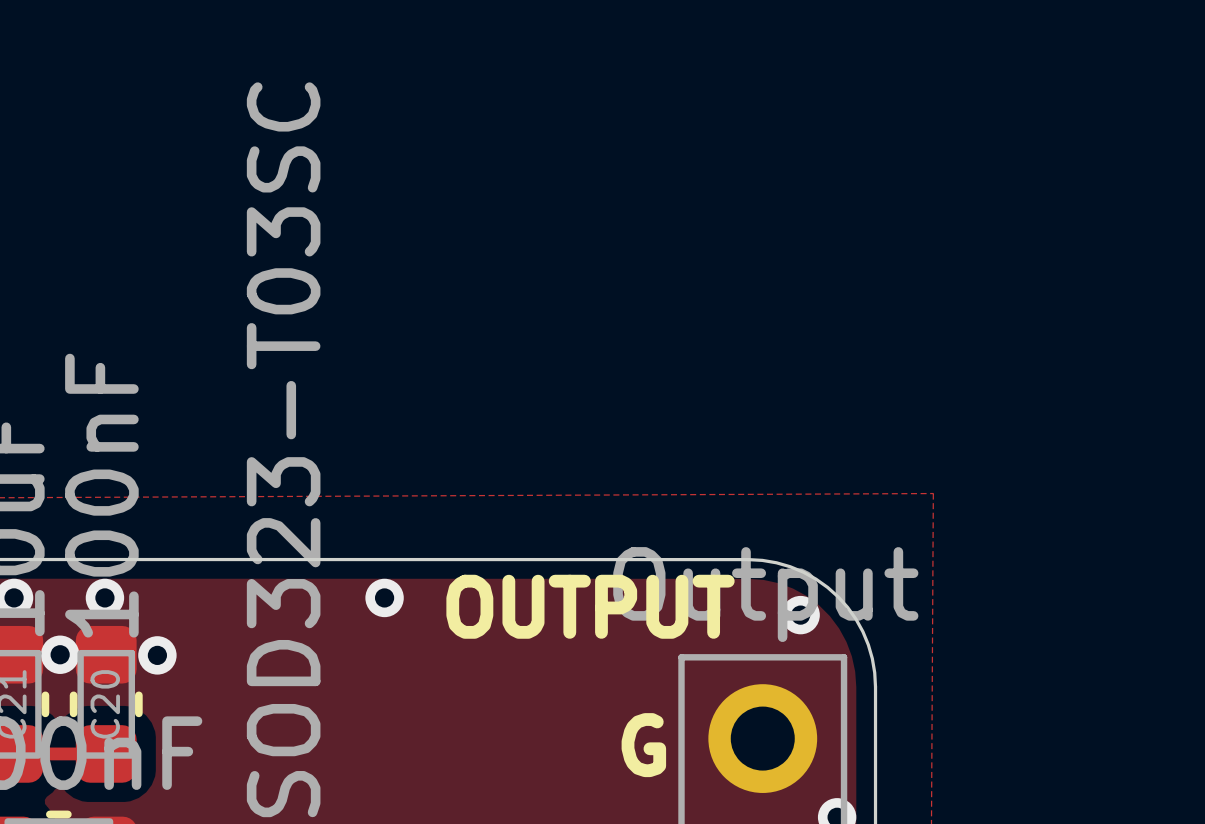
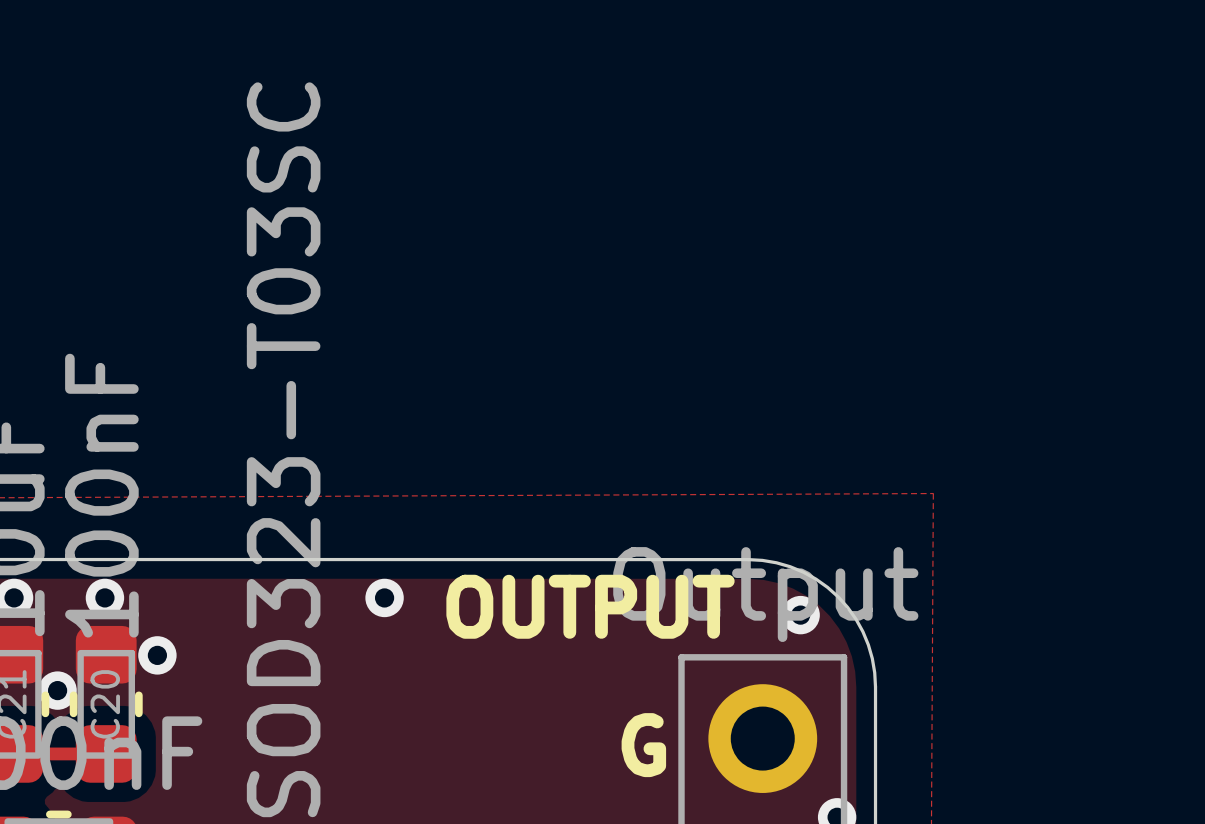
via position: (60, 654) -> (57, 690)

